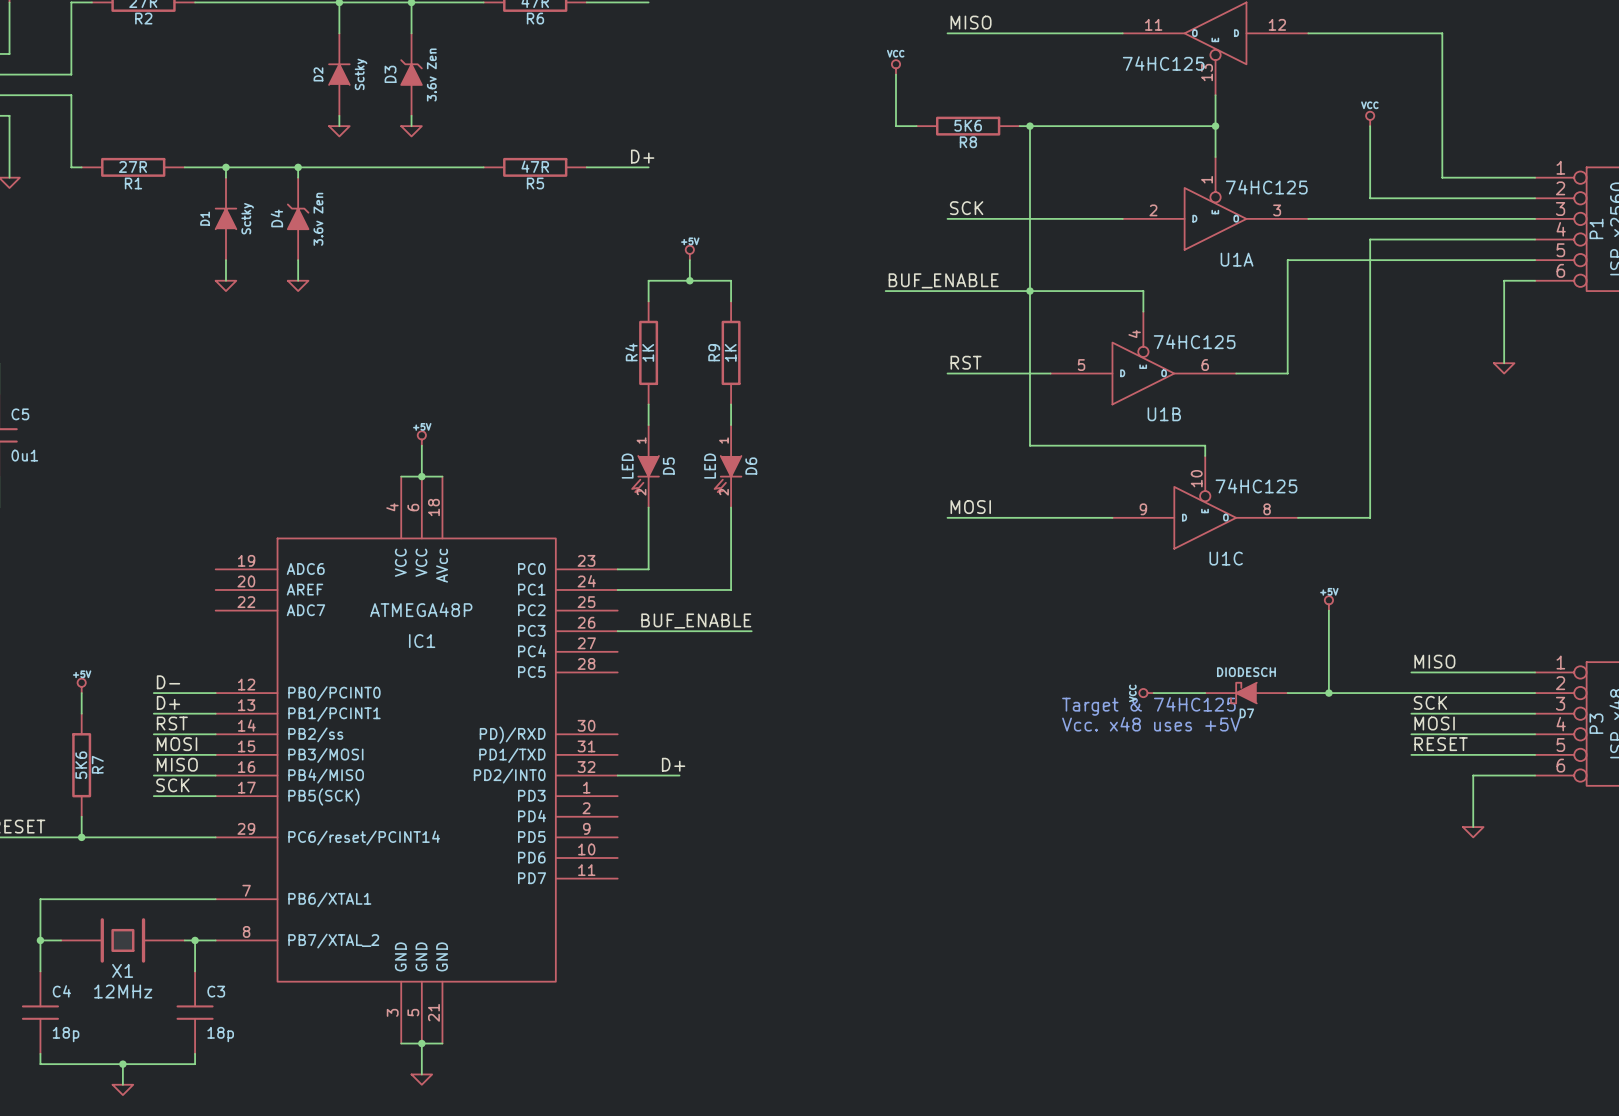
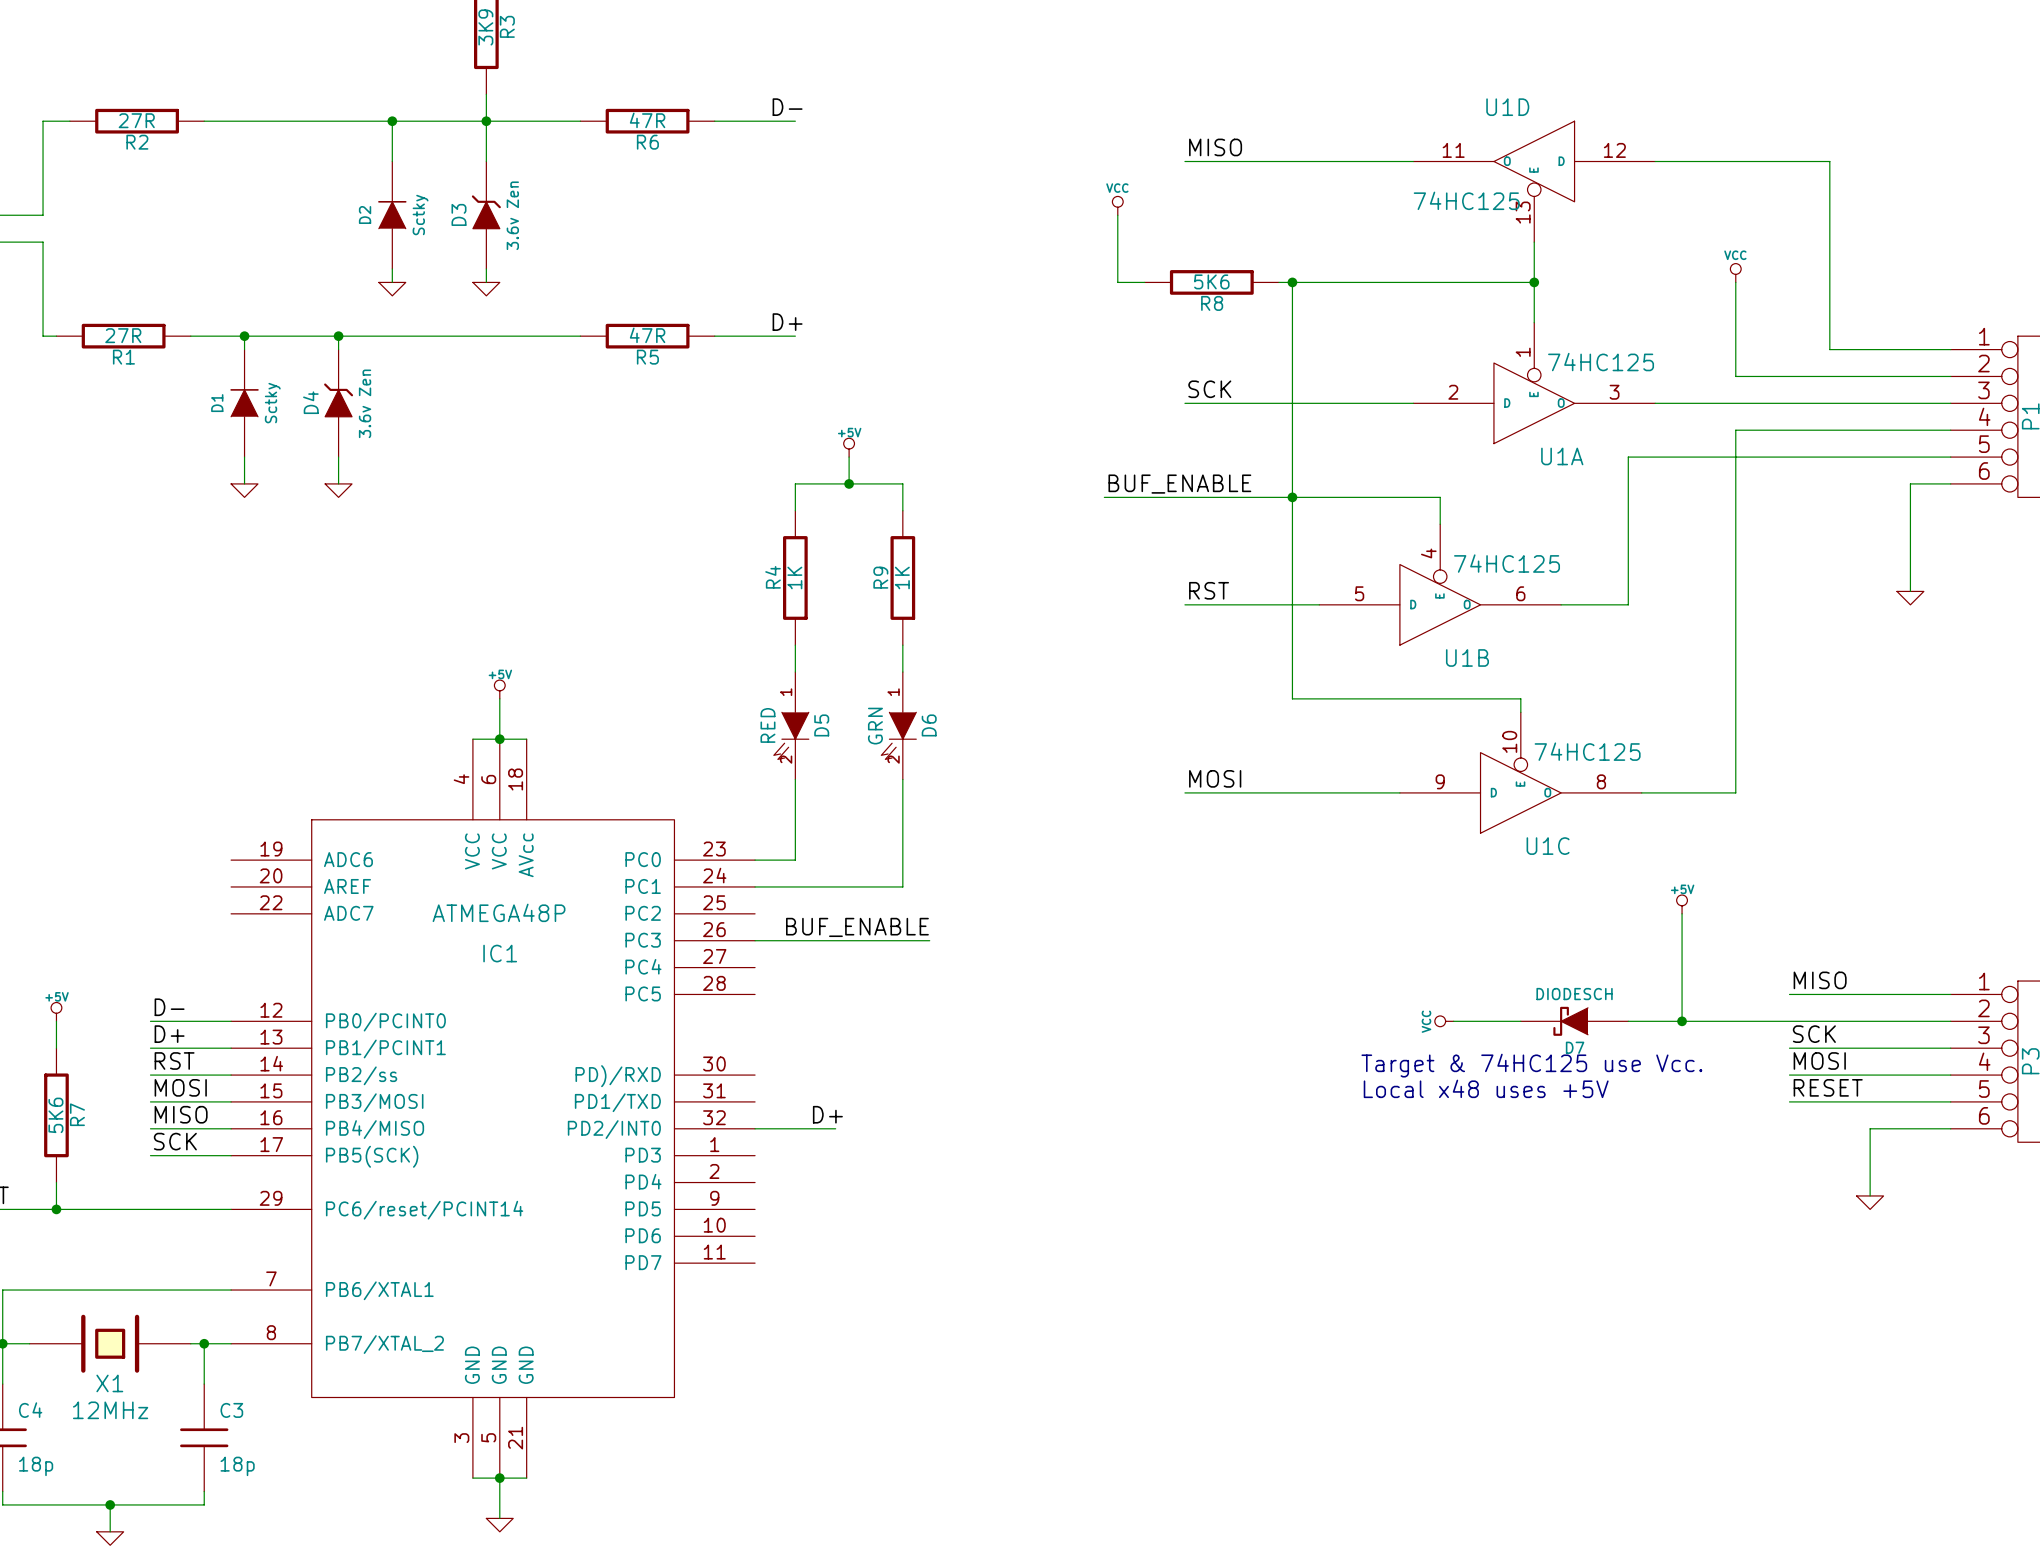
D5 value: LED (627, 466) -> RED (767, 725)
D6 value: LED (710, 466) -> GRN (875, 726)
text: Target & 74HC125 (1148, 706) -> Target & 74HC125 use Vcc. (1531, 1065)
text: Vcc. x48 uses +5V (1151, 724) -> Local x48 uses +5V (1486, 1088)

